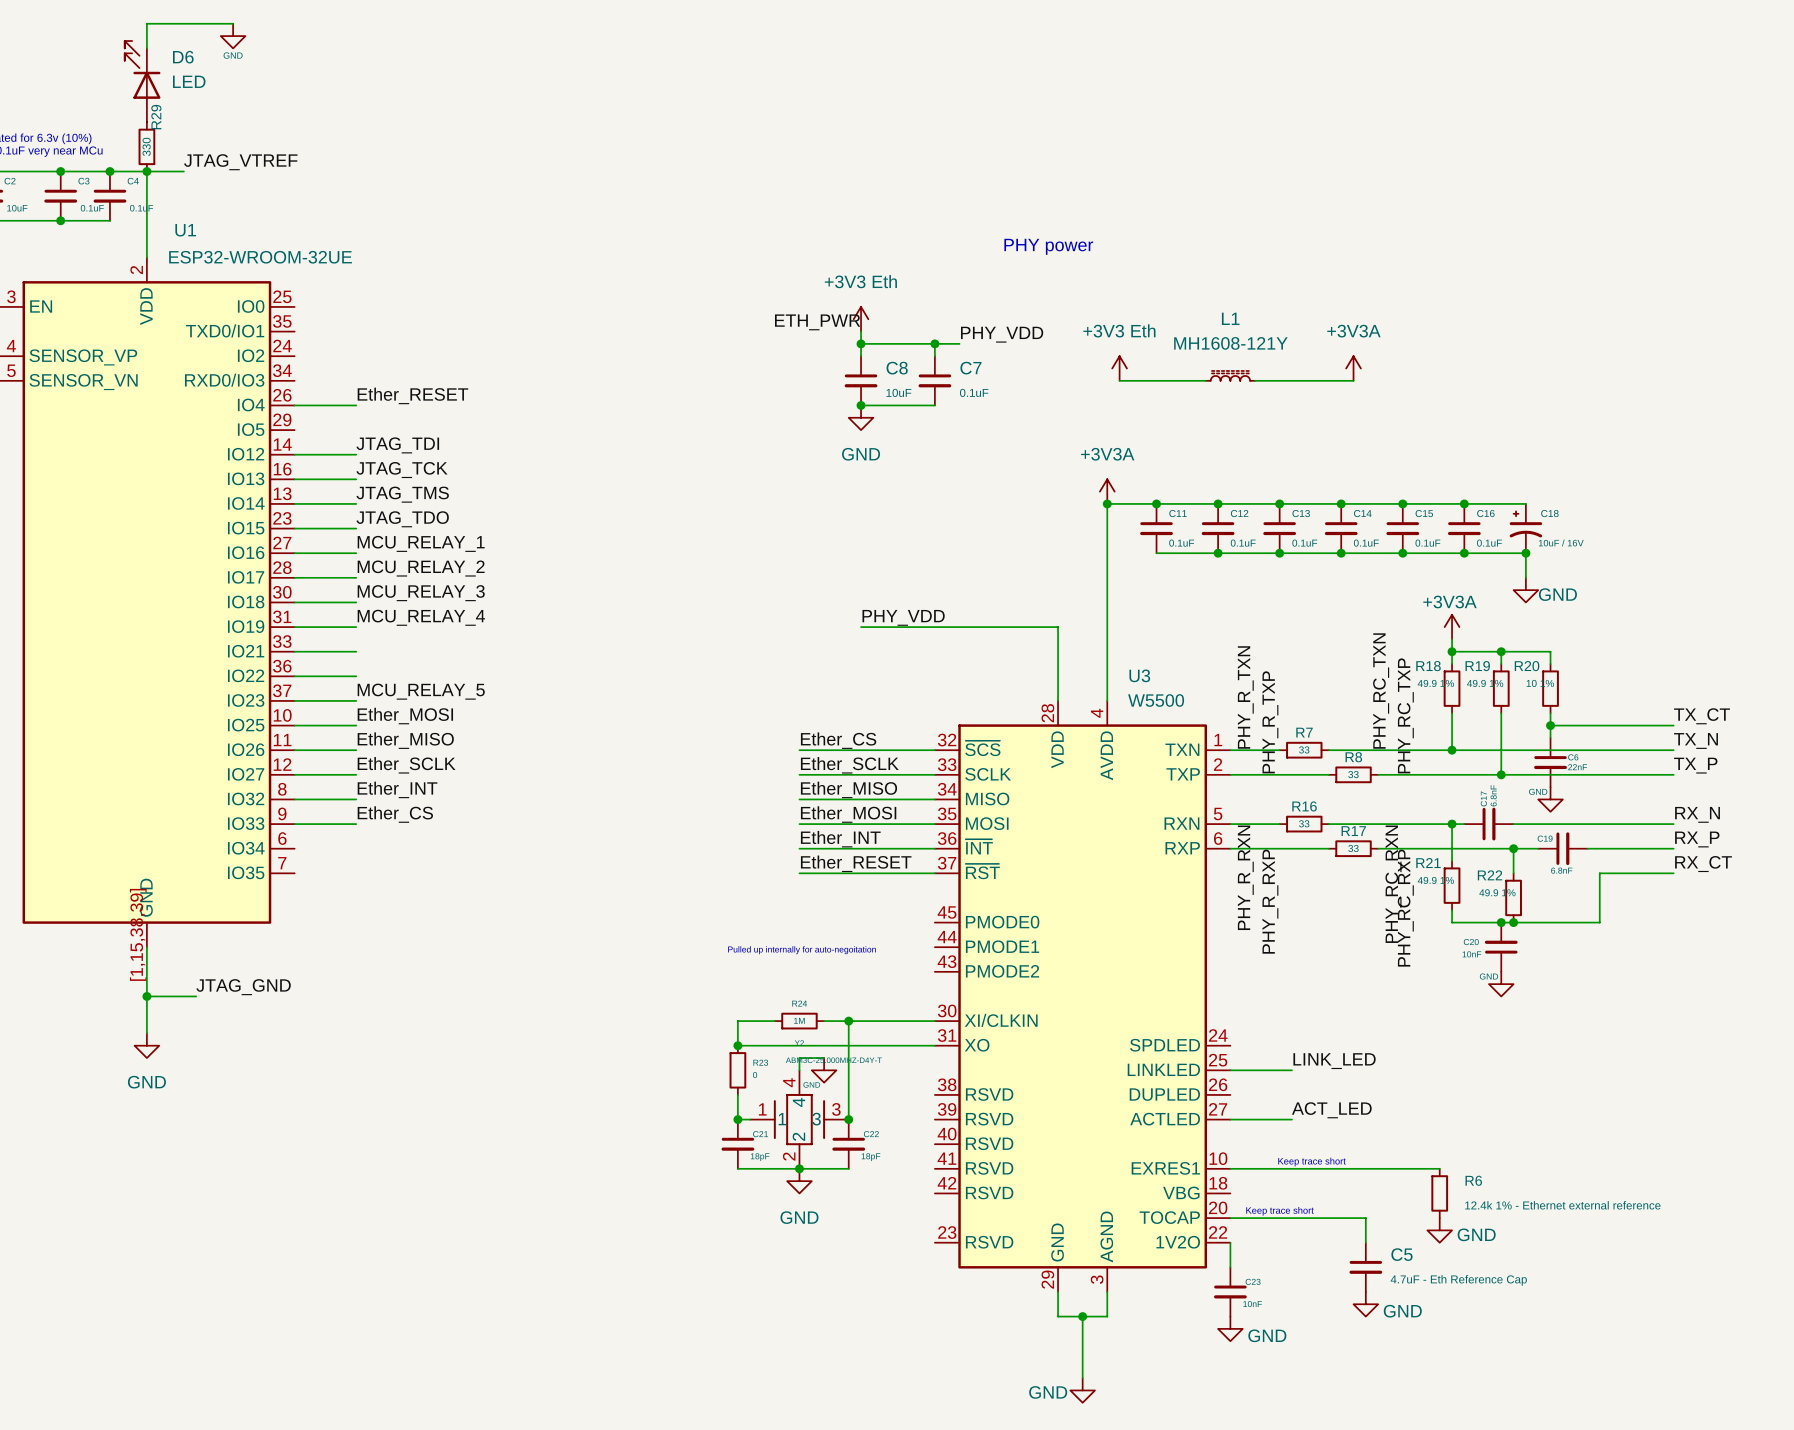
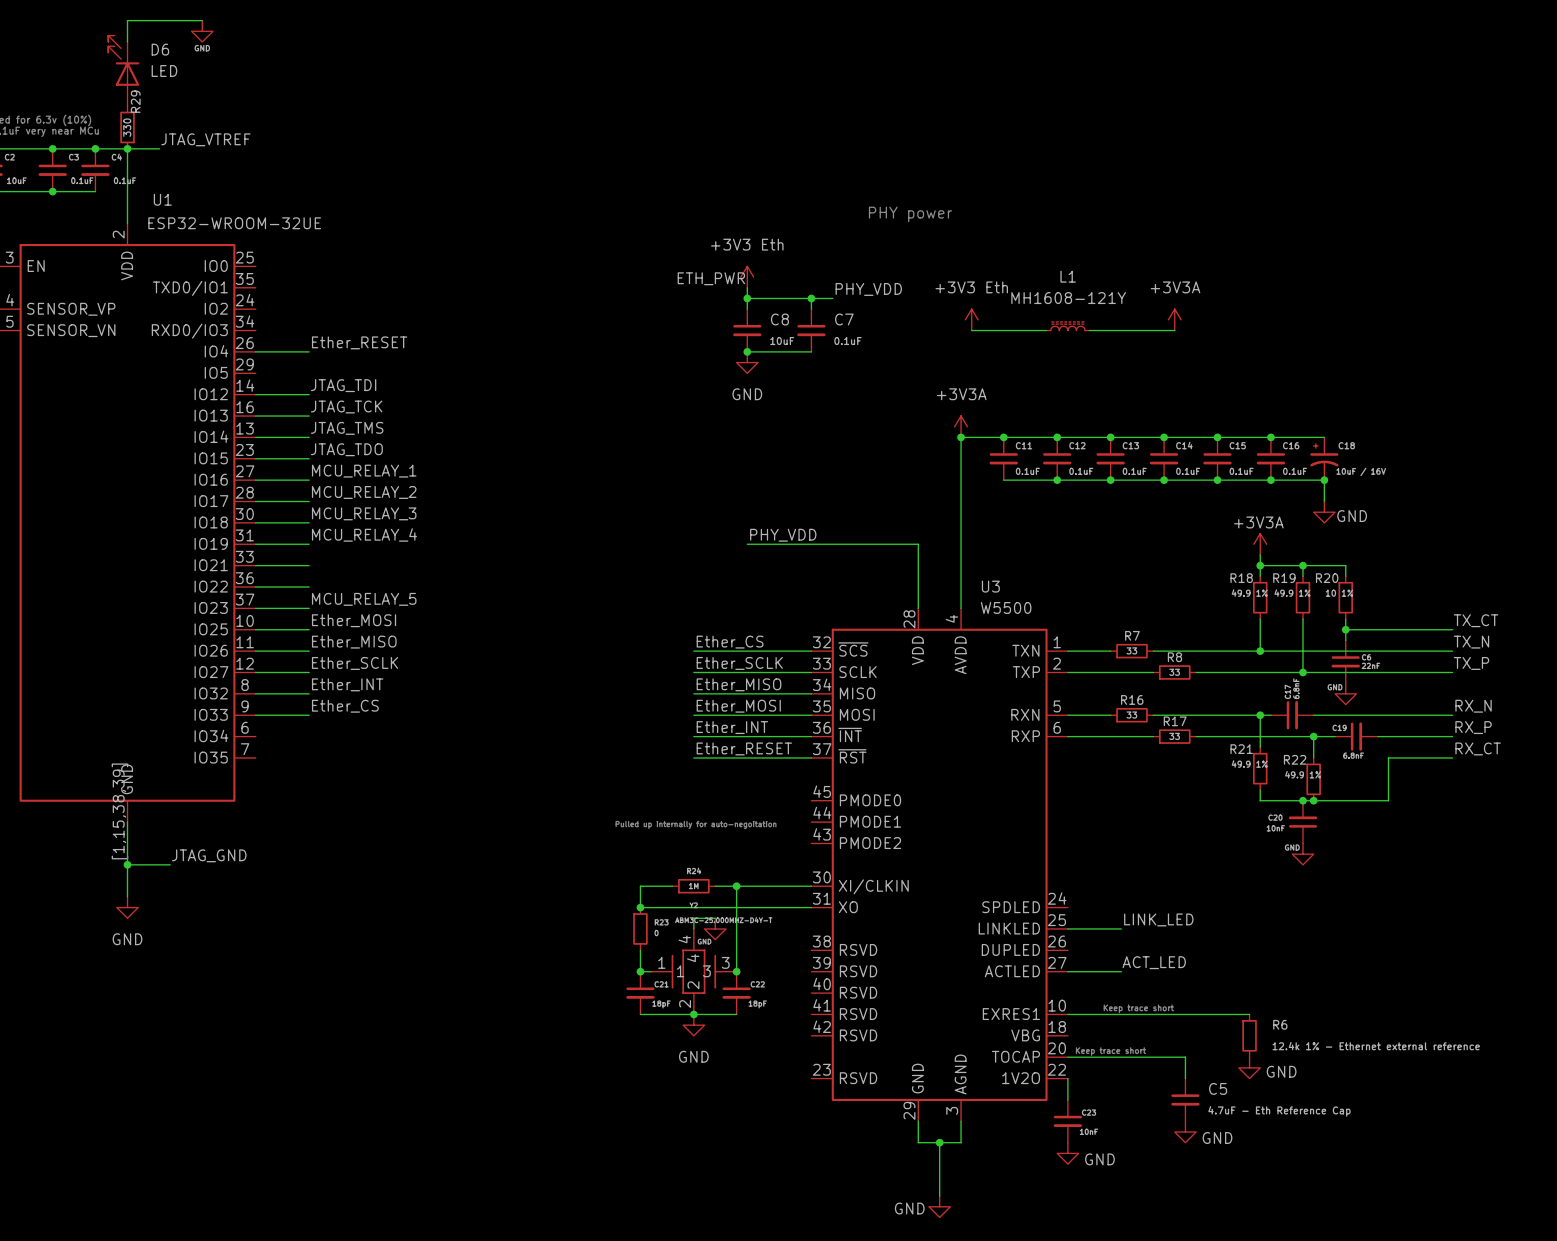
label: PHY_RC_TXN (1381, 691) -> none
label: PHY_R_TXN (1245, 697) -> none
label: PHY_RC_TXP (1405, 715) -> none
label: PHY_R_TXP (1270, 722) -> none
label: PHY_R_RXN (1245, 877) -> none
label: PHY_RC_RXN (1393, 884) -> none
label: PHY_R_RXP (1270, 901) -> none
label: PHY_RC_RXP (1405, 908) -> none

